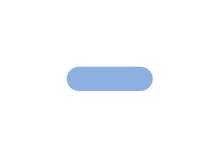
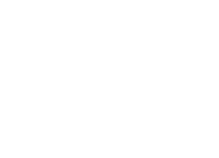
bottom track: (140, 78) (78, 78) -> none

